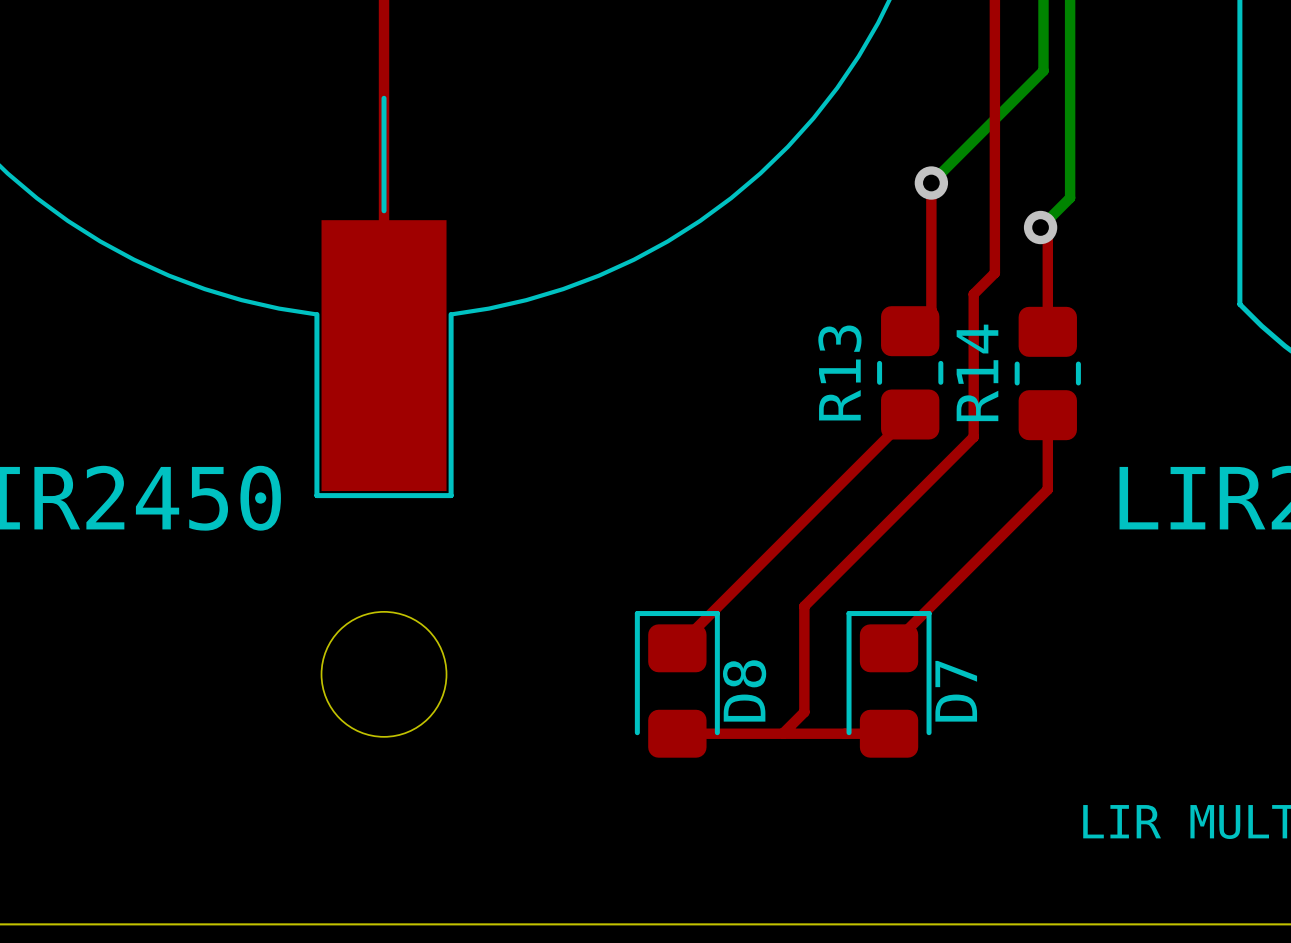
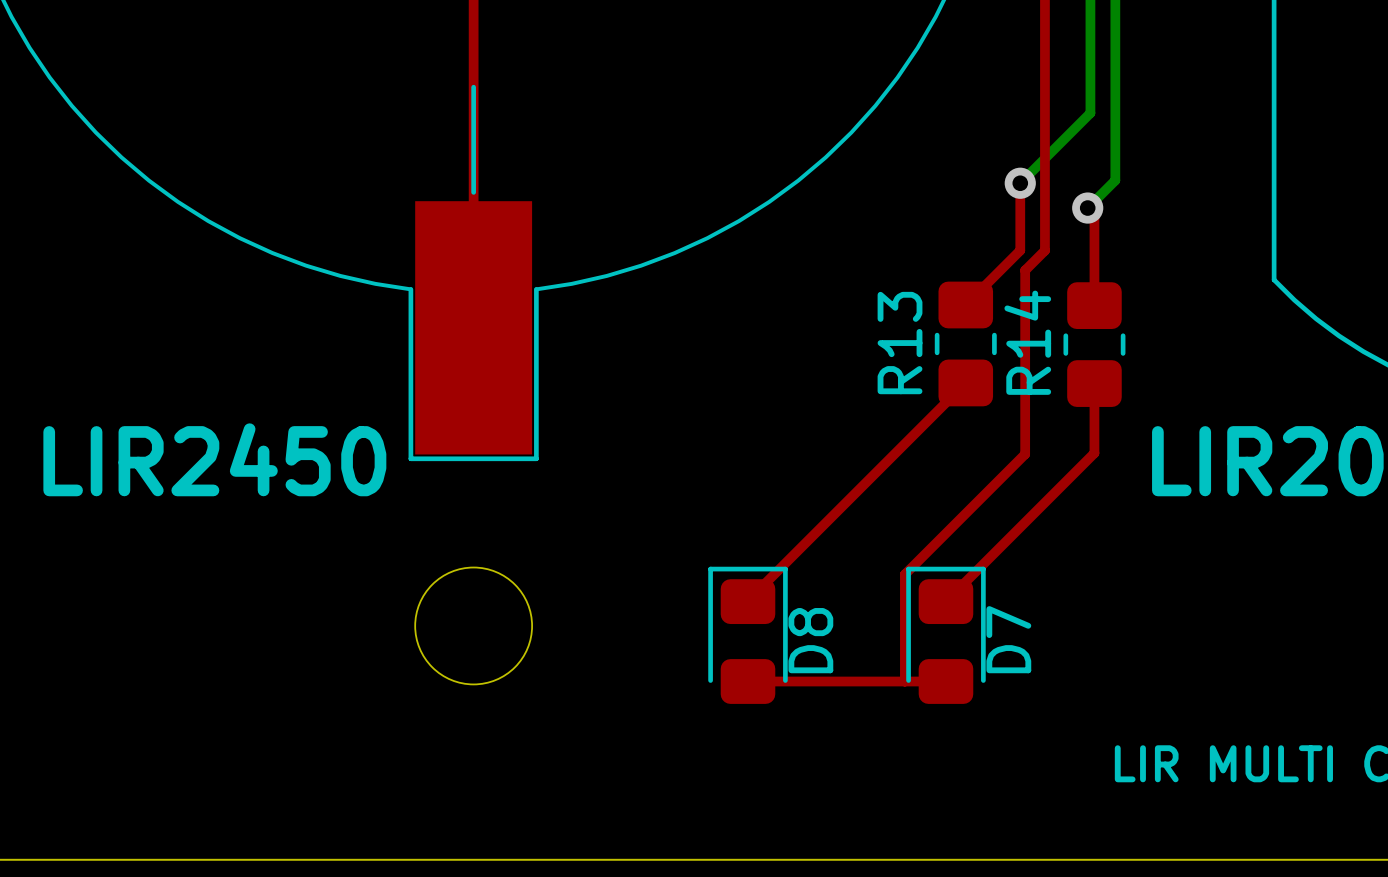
bottom track: (1043, 70) (931, 183) -> (1090, 61) (1090, 113) (1020, 183)
top track: (931, 183) (931, 310) -> (1020, 183) (1020, 250) (985, 285)
via position: (931, 183) -> (1020, 183)
top track: (973, 437) (804, 606) (804, 712) (783, 733) -> (1025, 403) (1025, 454) (904, 574) (904, 681)

